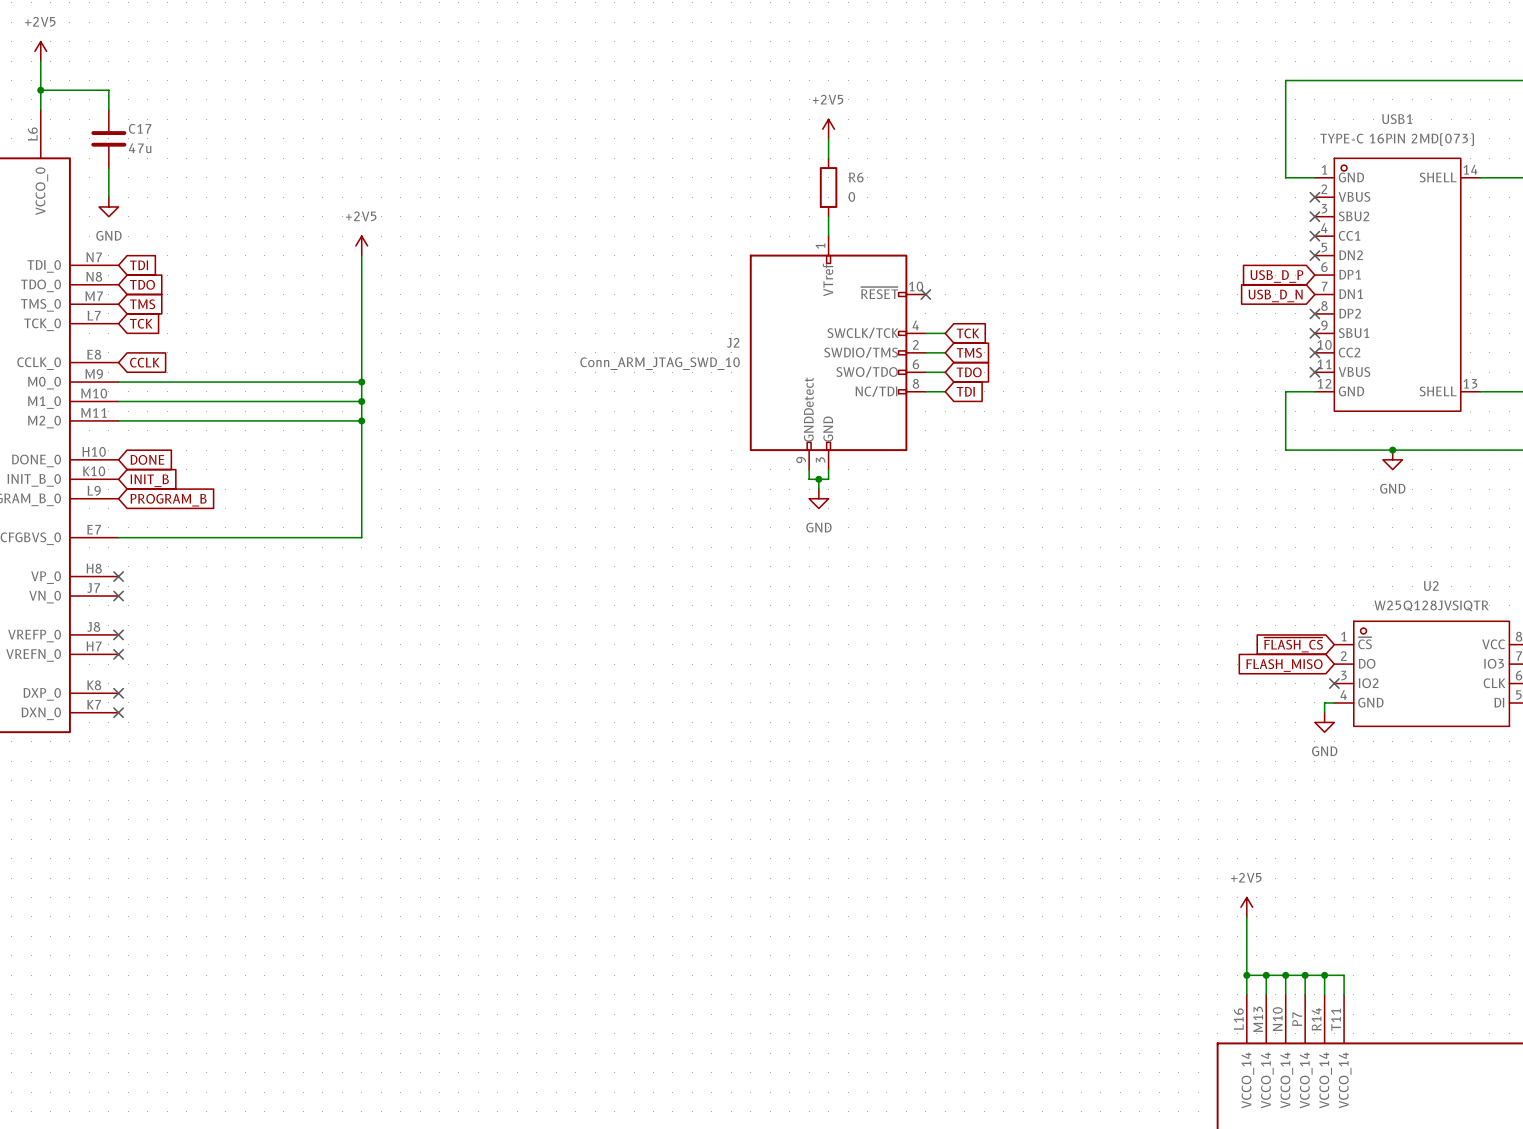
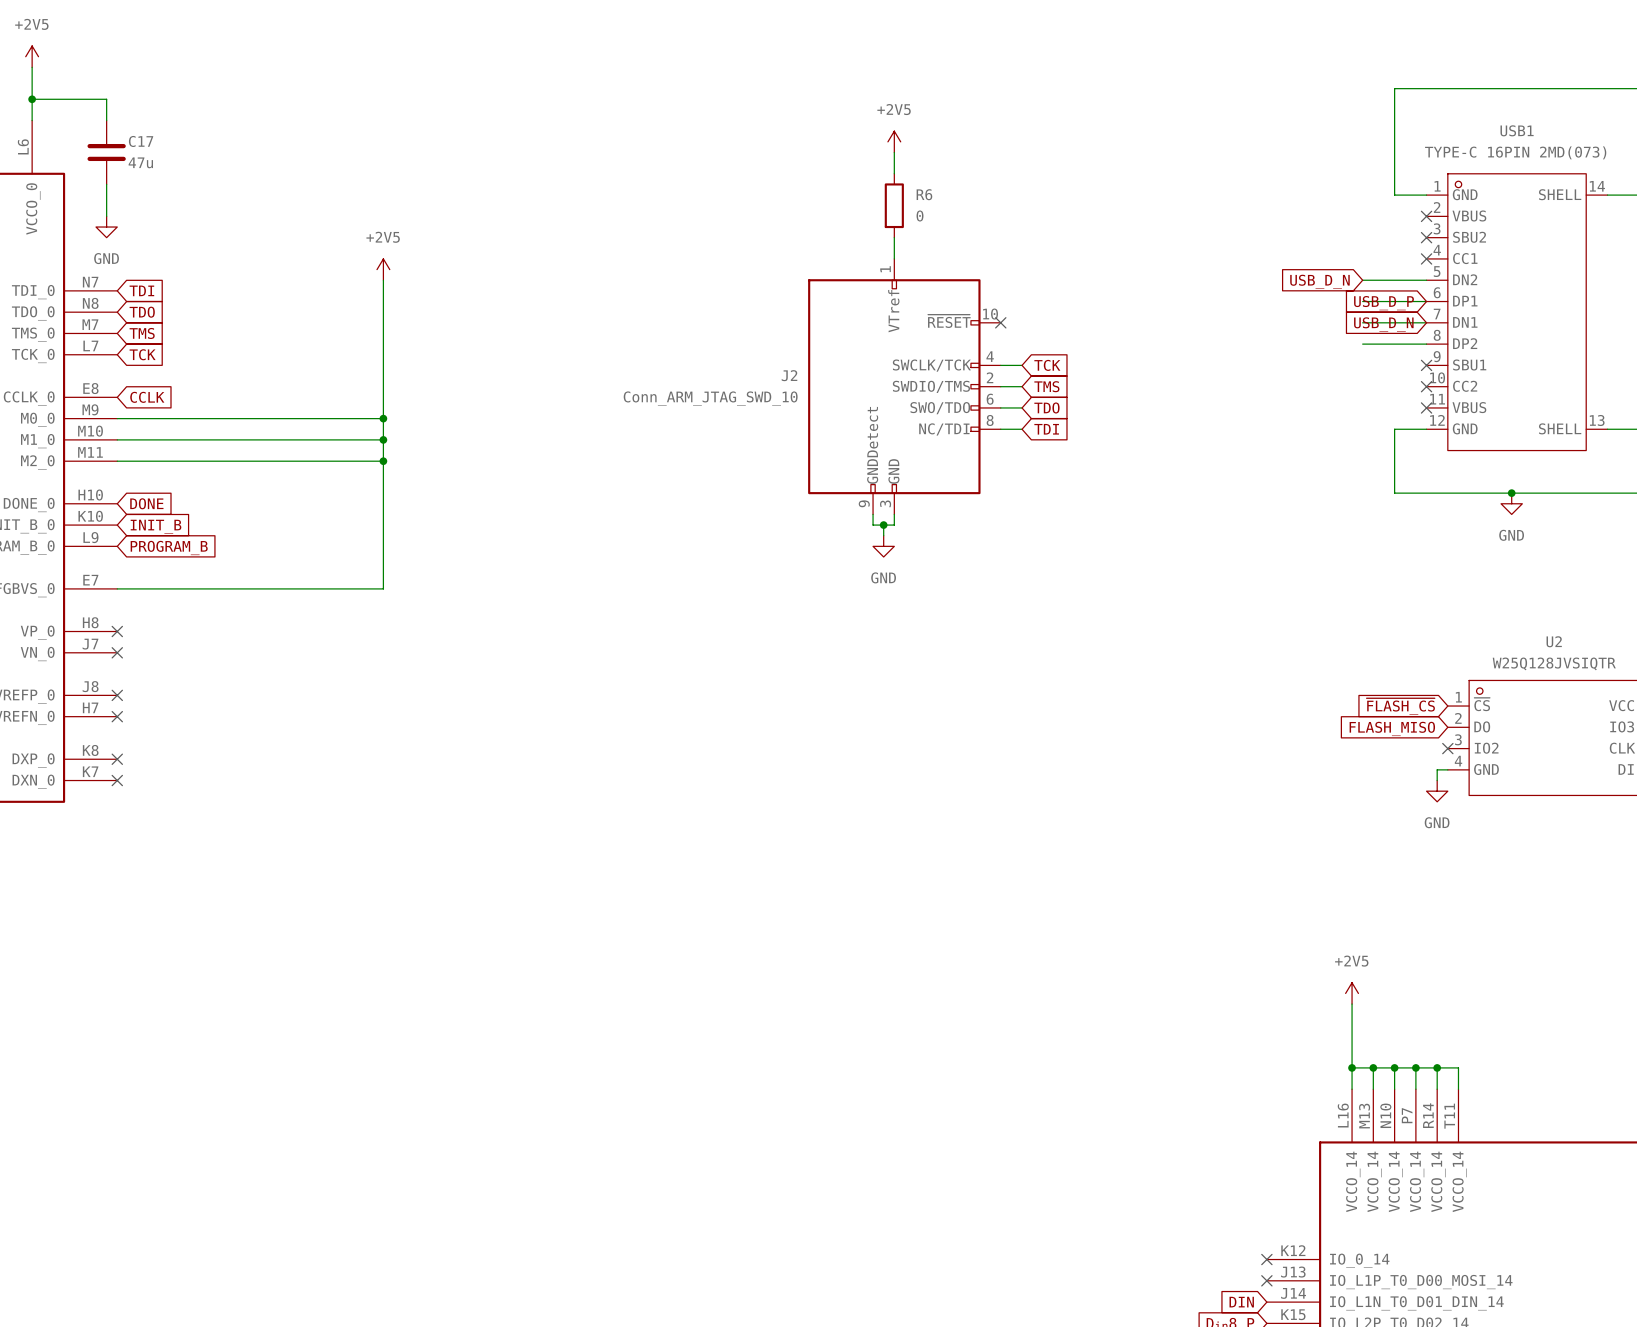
wire: none -> (1362, 280) (1426, 280)
no-connect mark: (1314, 255) -> none
global label: none -> USB_D_N (1319, 281)
wire: none -> (1362, 301) (1426, 301)
wire: none -> (1362, 322) (1426, 322)
wire: none -> (1362, 344) (1426, 344)
no-connect mark: (1314, 313) -> none

